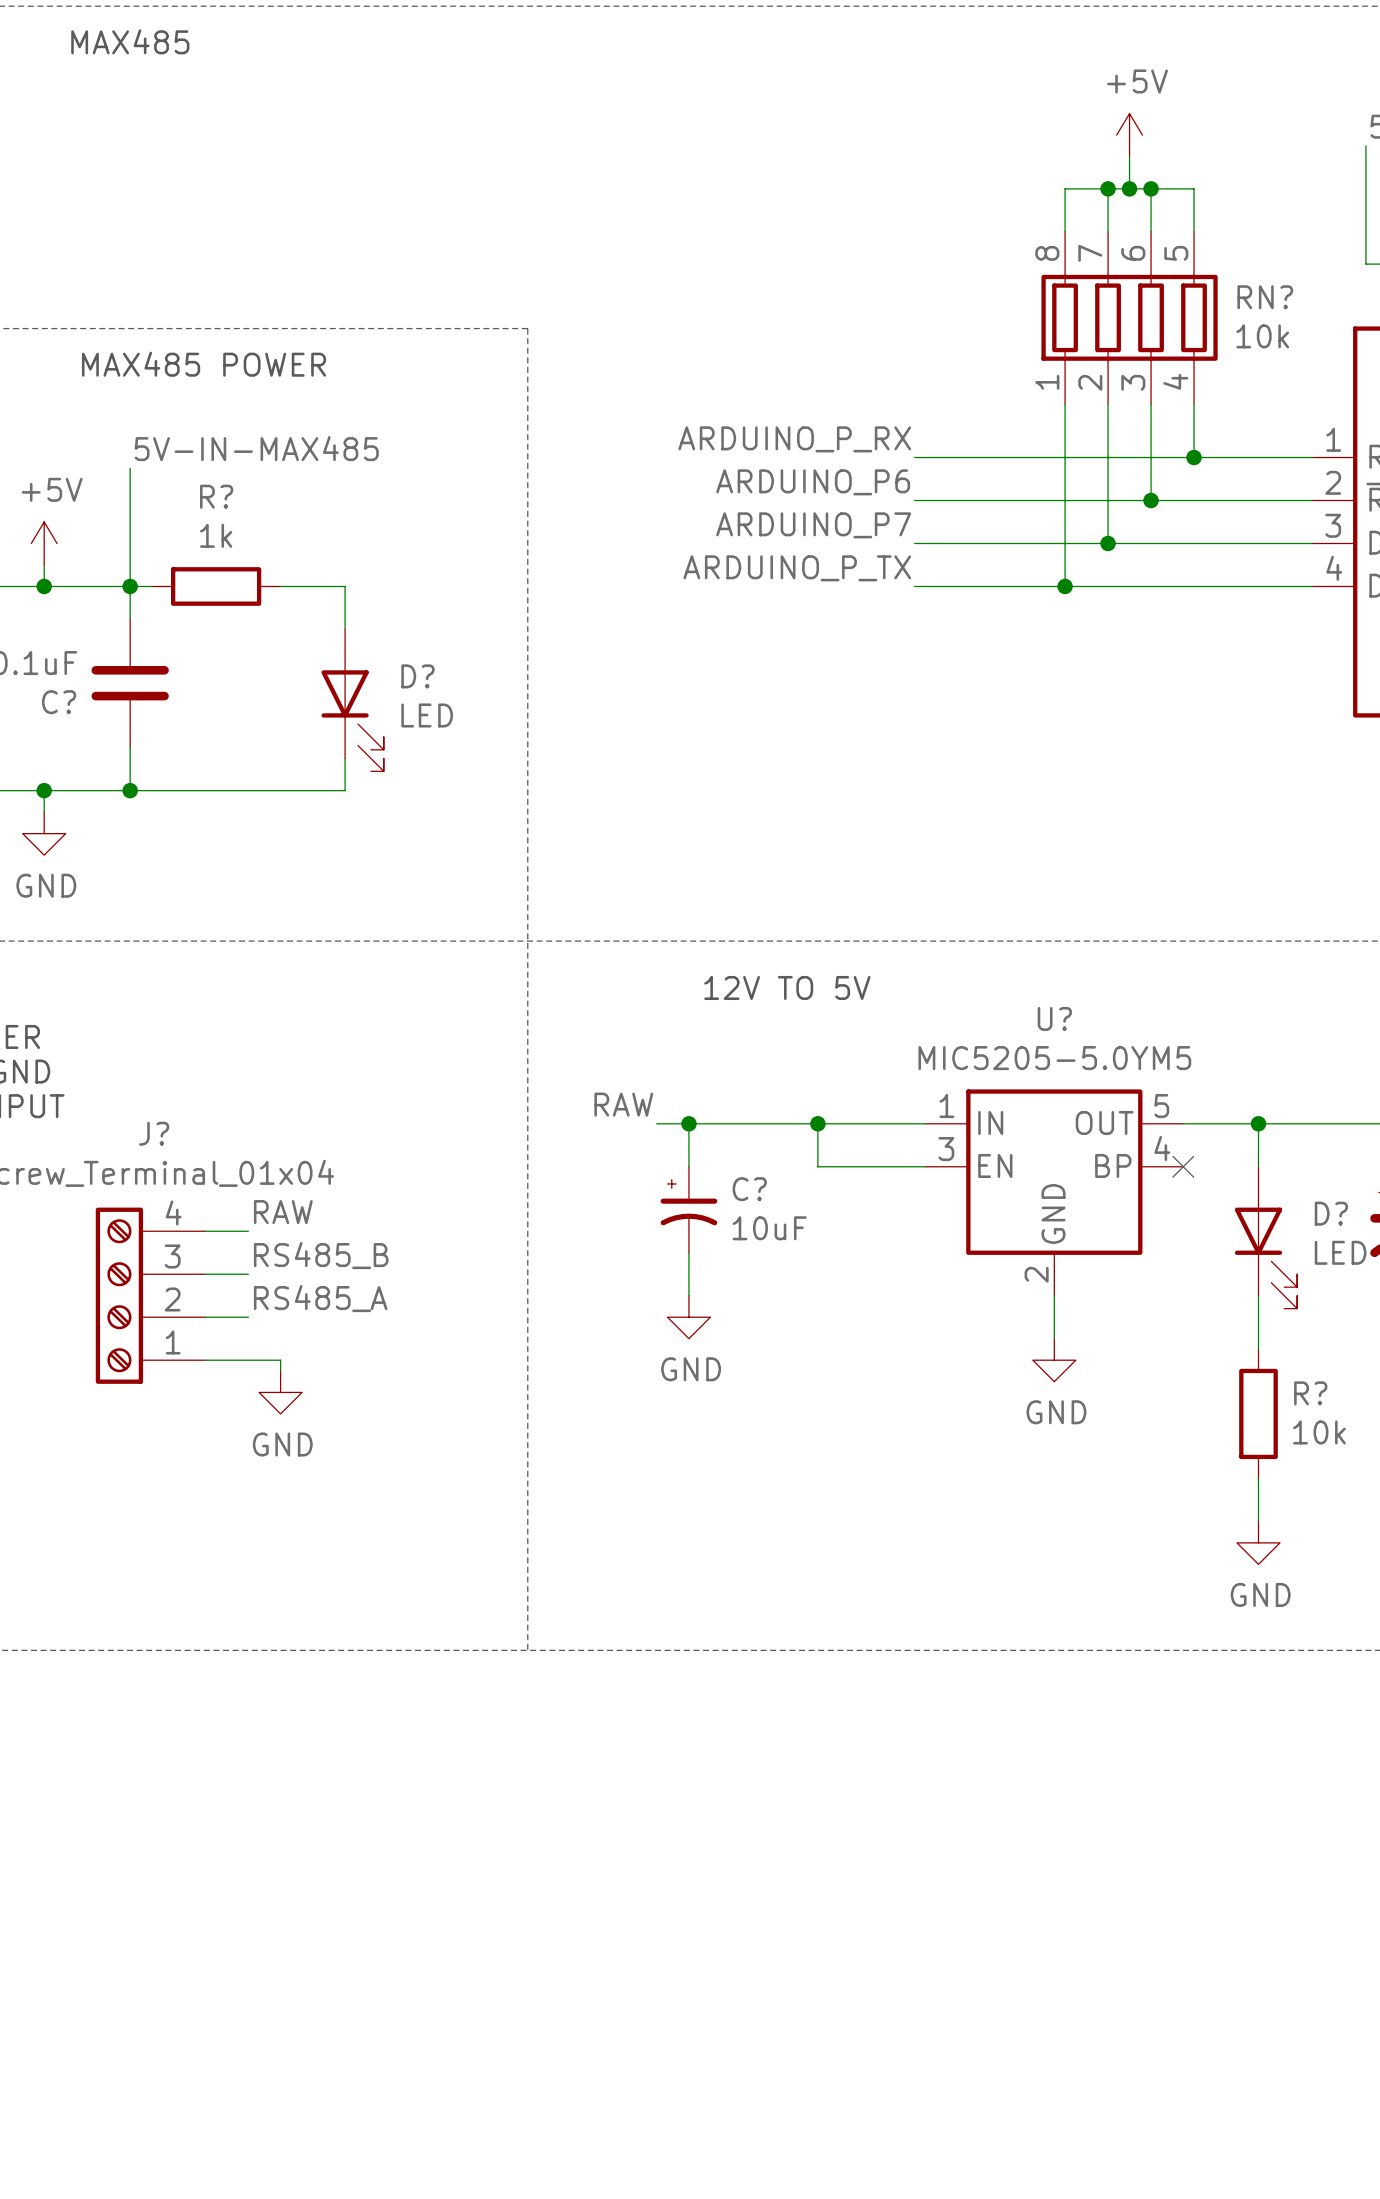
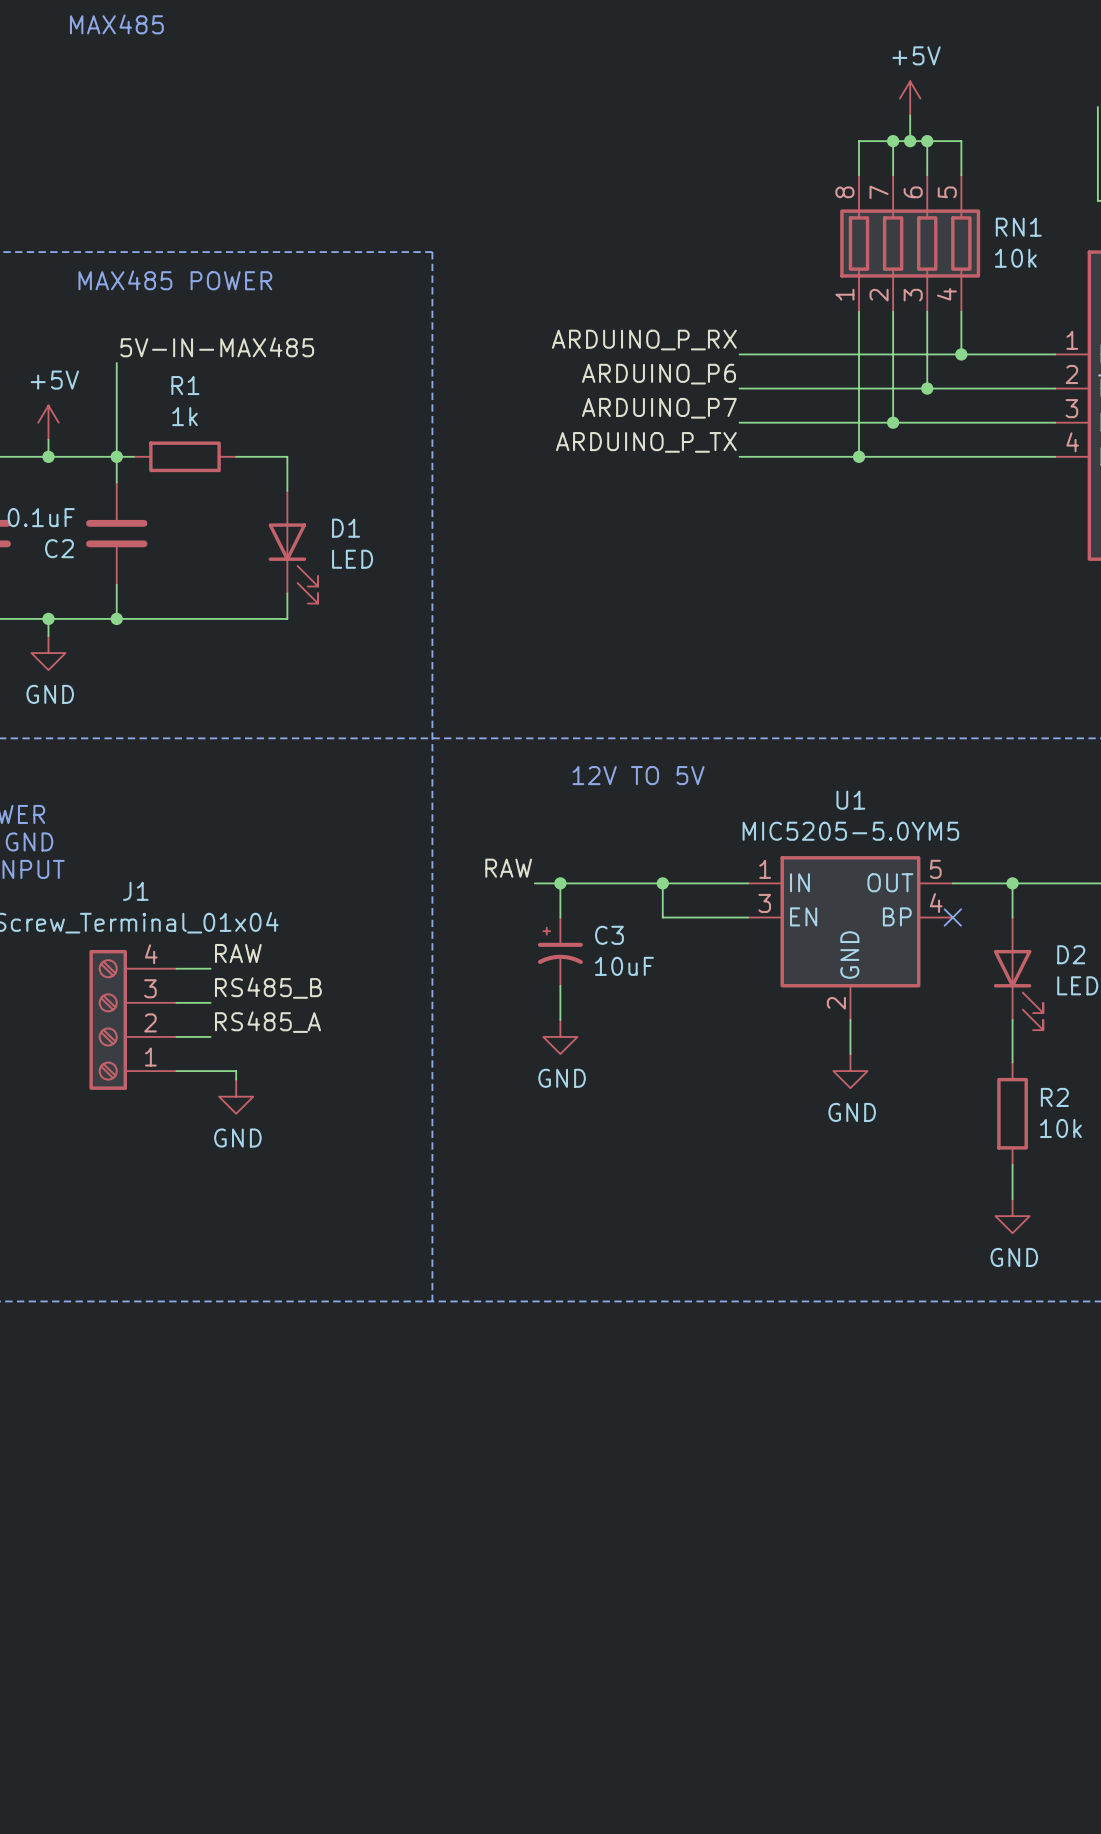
RN? name: RN? (1265, 297) -> RN1 (1018, 227)
R? name: R? (216, 496) -> R1 (185, 385)
D? name: D? (417, 676) -> D1 (346, 528)
C? name: C? (59, 702) -> C2 (59, 548)
U? name: U? (1054, 1018) -> U1 (850, 800)
J? name: J? (154, 1133) -> J1 (135, 891)
C? name: C? (749, 1189) -> C3 (609, 935)
D? name: D? (1331, 1213) -> D2 (1071, 954)
R? name: R? (1310, 1393) -> R2 (1054, 1097)

